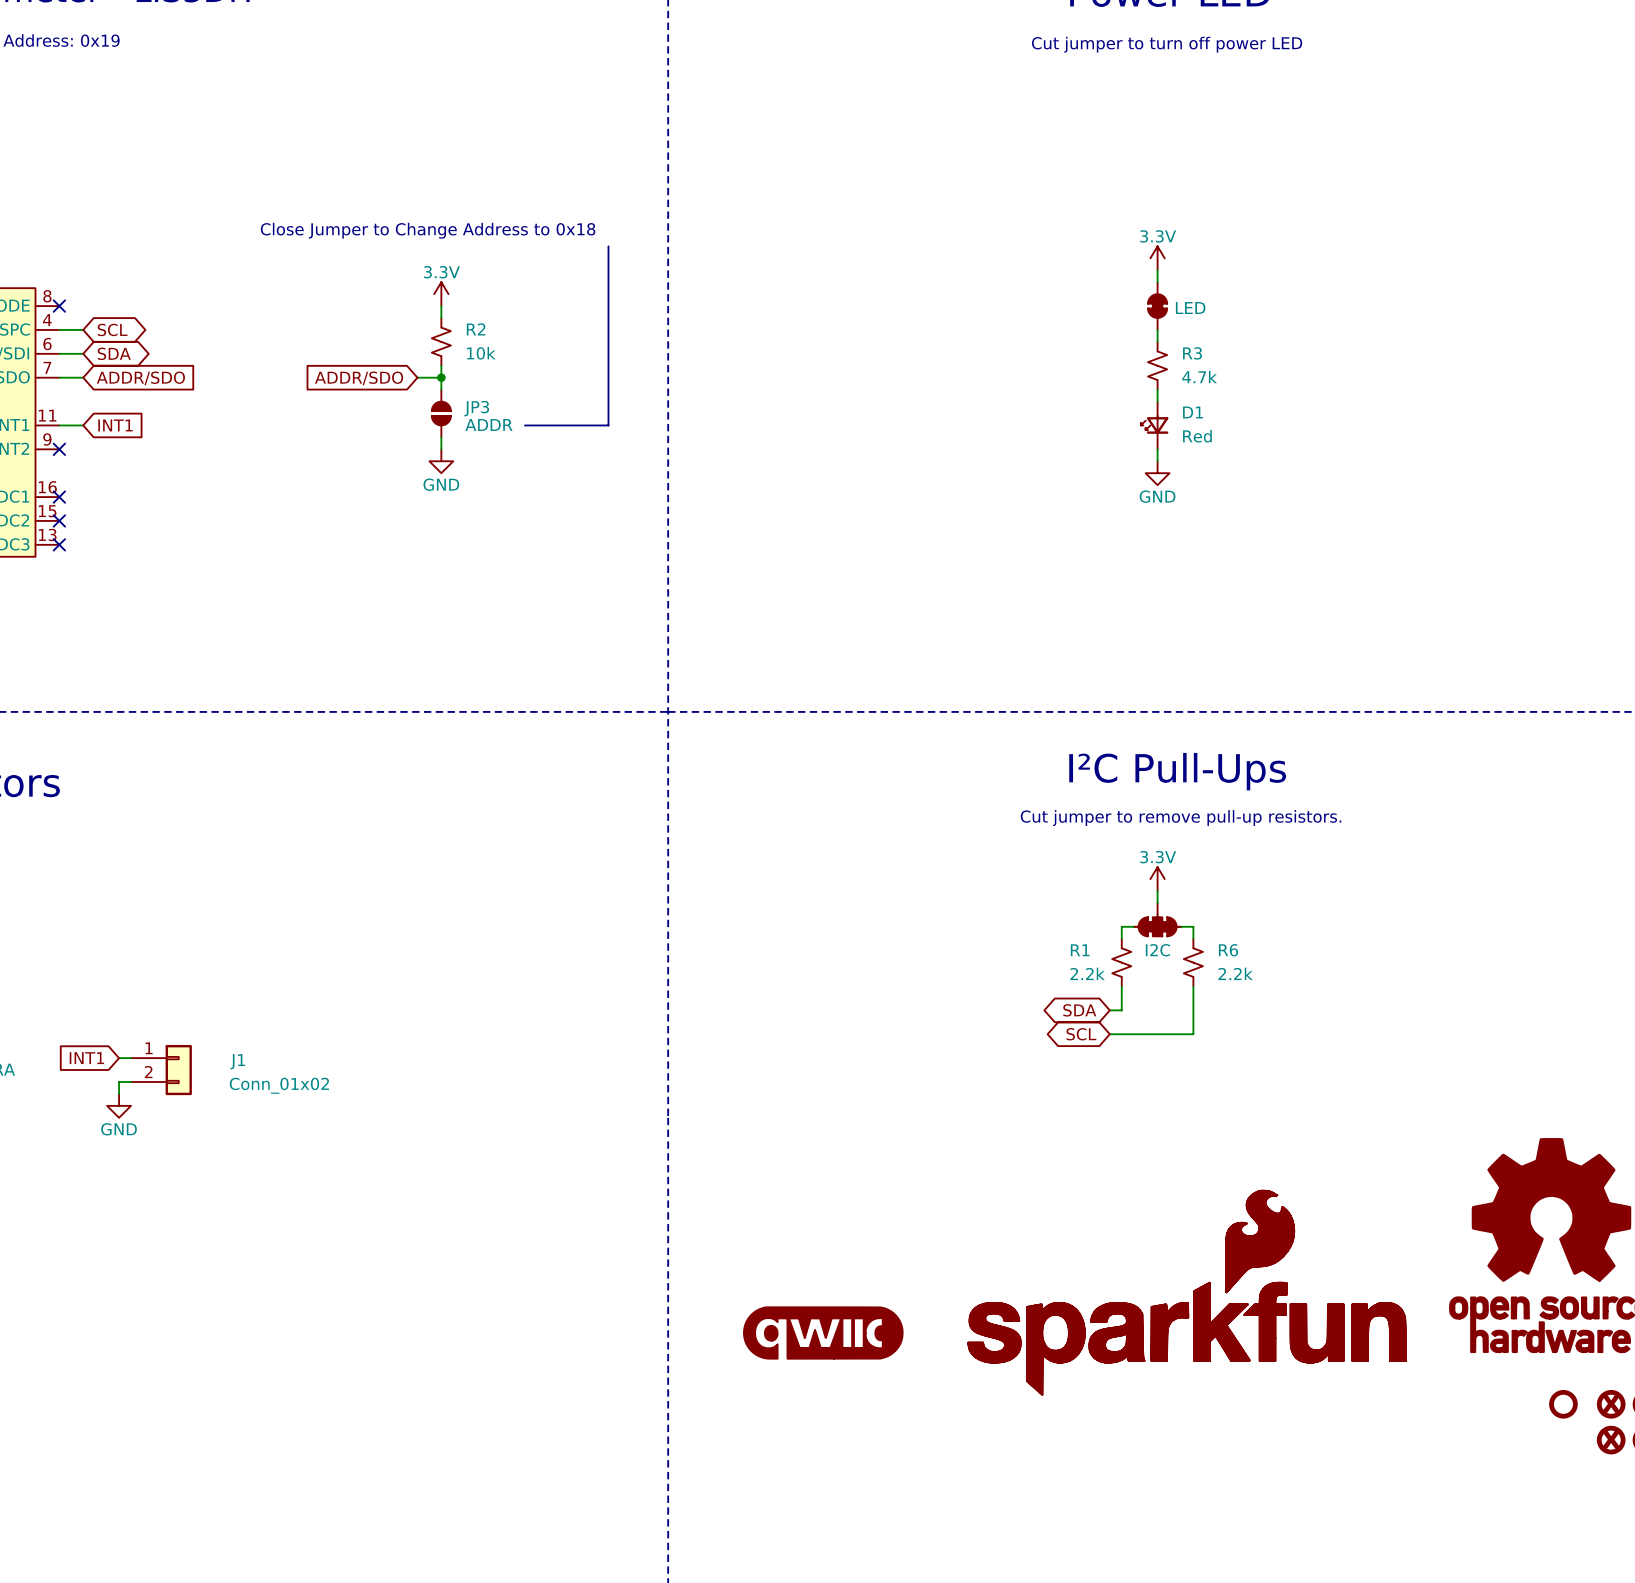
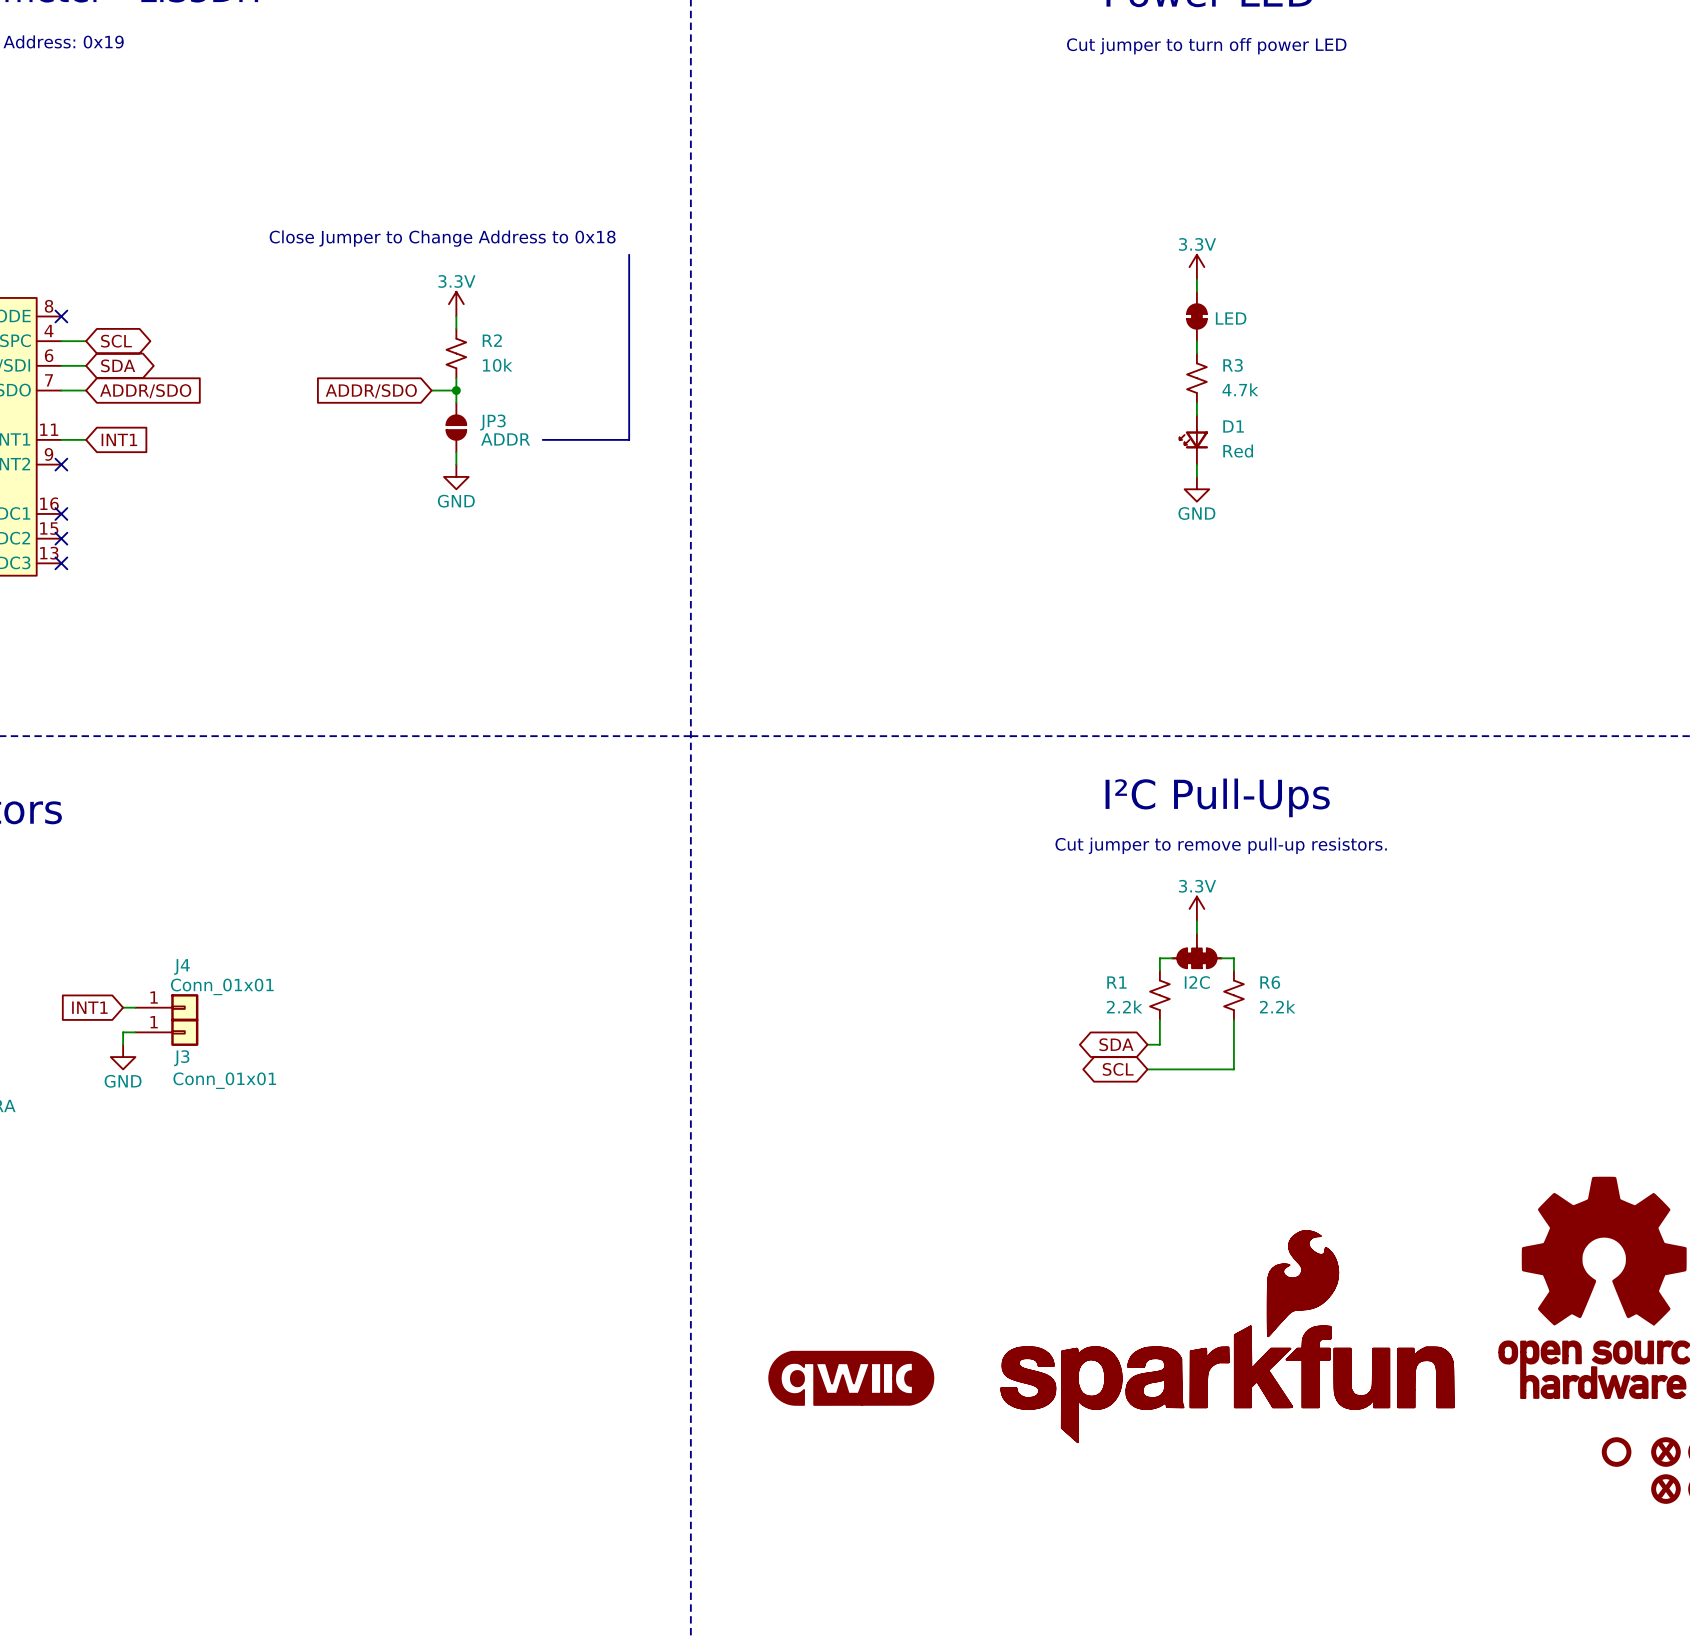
J4: none -> Conn_01x01 (166, 1007)
J3: none -> Conn_01x01 (166, 1032)
global label position: INT1 (86, 1058) -> INT1 (89, 1007)
wire: (119, 1058) (130, 1058) -> (123, 1007) (135, 1007)
J1: Conn_01x02 (161, 1070) -> none
wire: (130, 1081) (119, 1081) (119, 1093) -> (135, 1032) (123, 1032) (123, 1044)
power symbol position: GND (119, 1105) -> GND (123, 1057)

